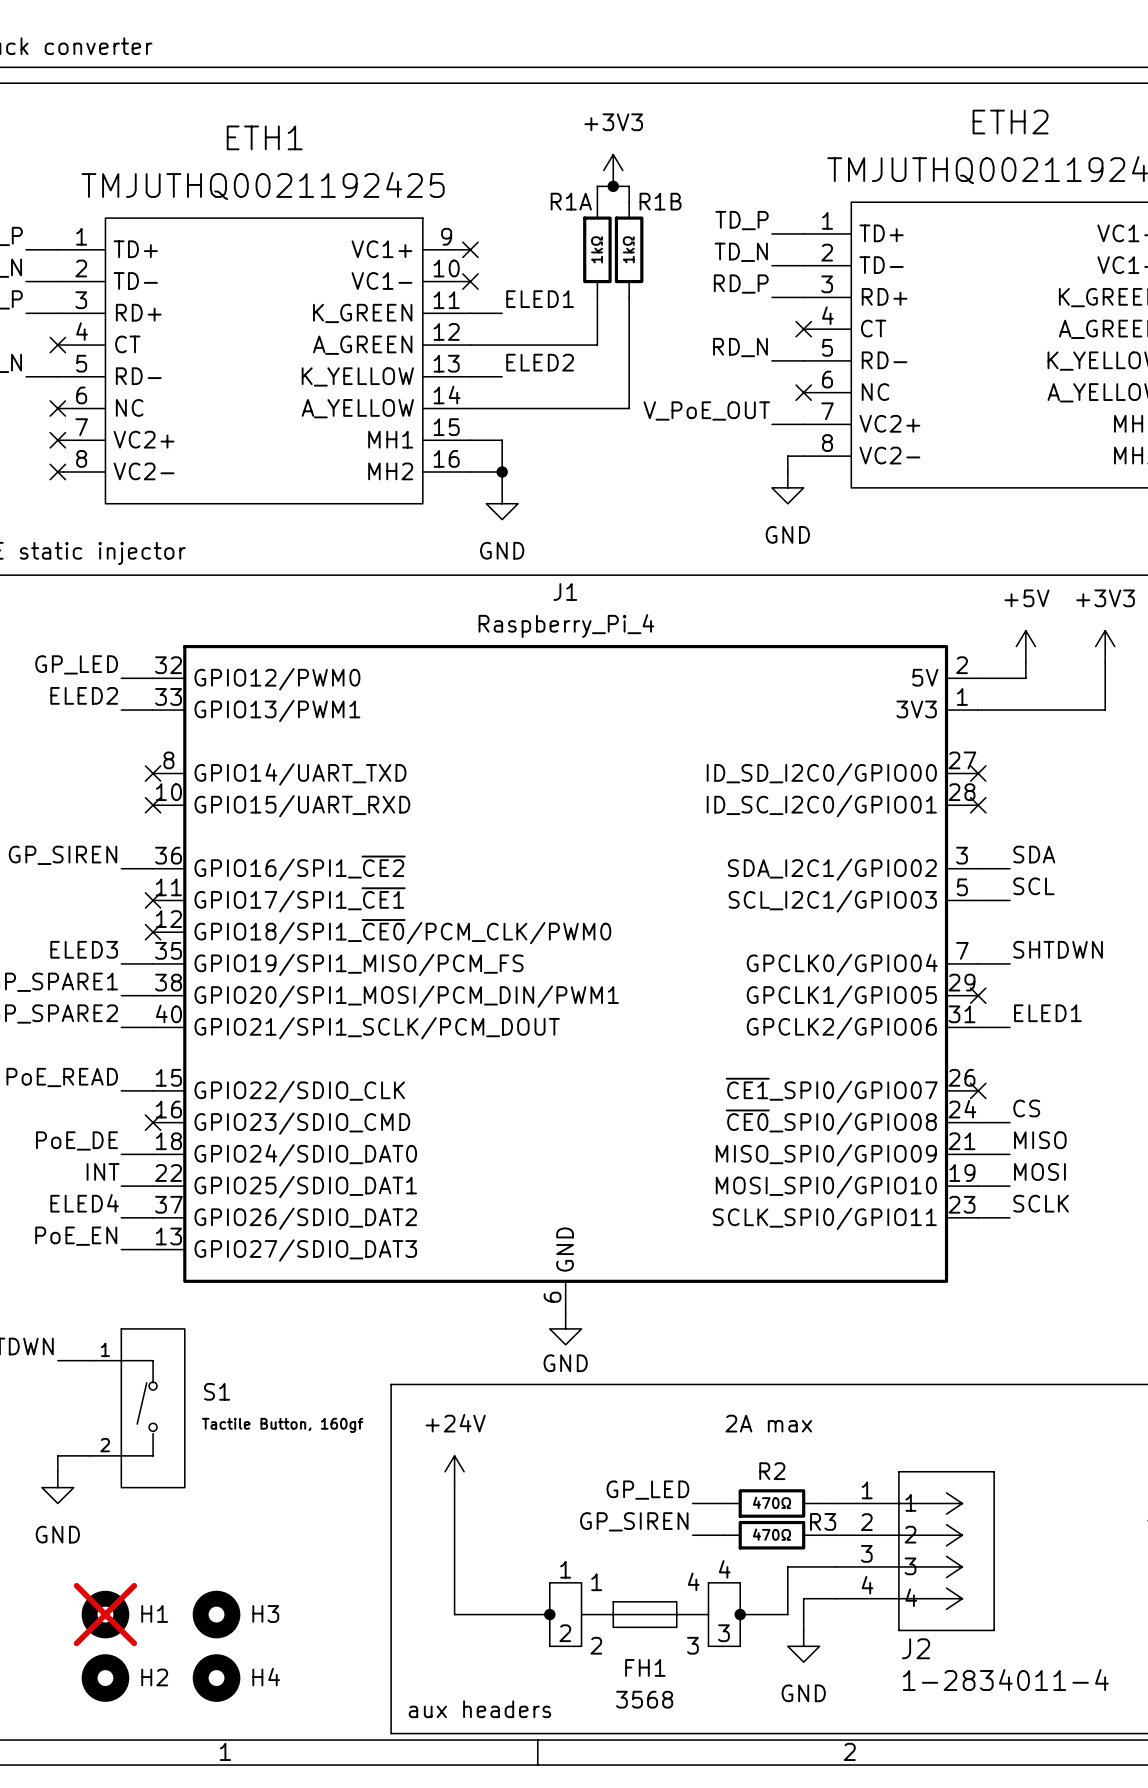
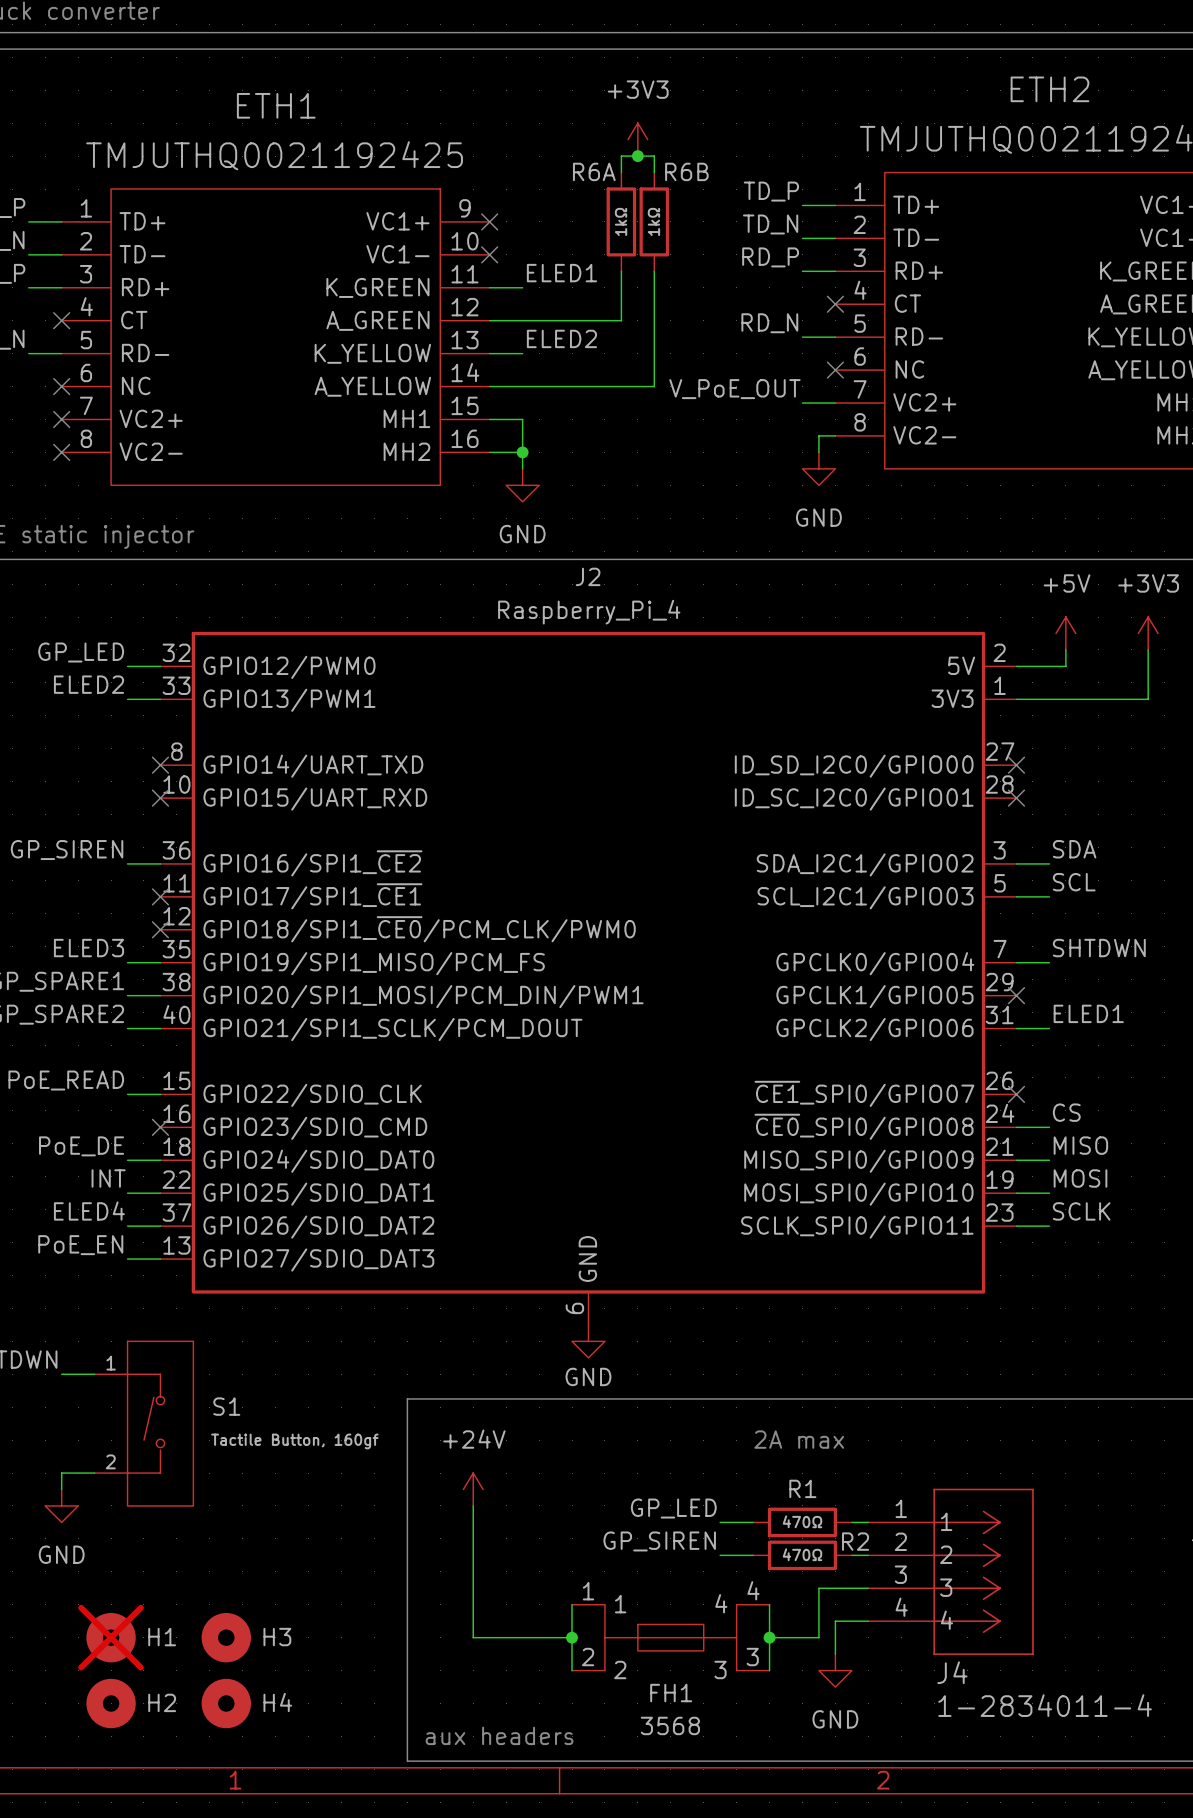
R1A name: R1A (571, 201) -> R6A (594, 171)
R1B name: R1B (660, 201) -> R6B (686, 171)
J1 name: J1 (565, 592) -> J2 (588, 576)
R2 name: R2 (772, 1471) -> R1 (802, 1488)
R3 name: R3 (823, 1521) -> R2 (855, 1541)
J2 name: J2 (916, 1648) -> J4 (952, 1672)

